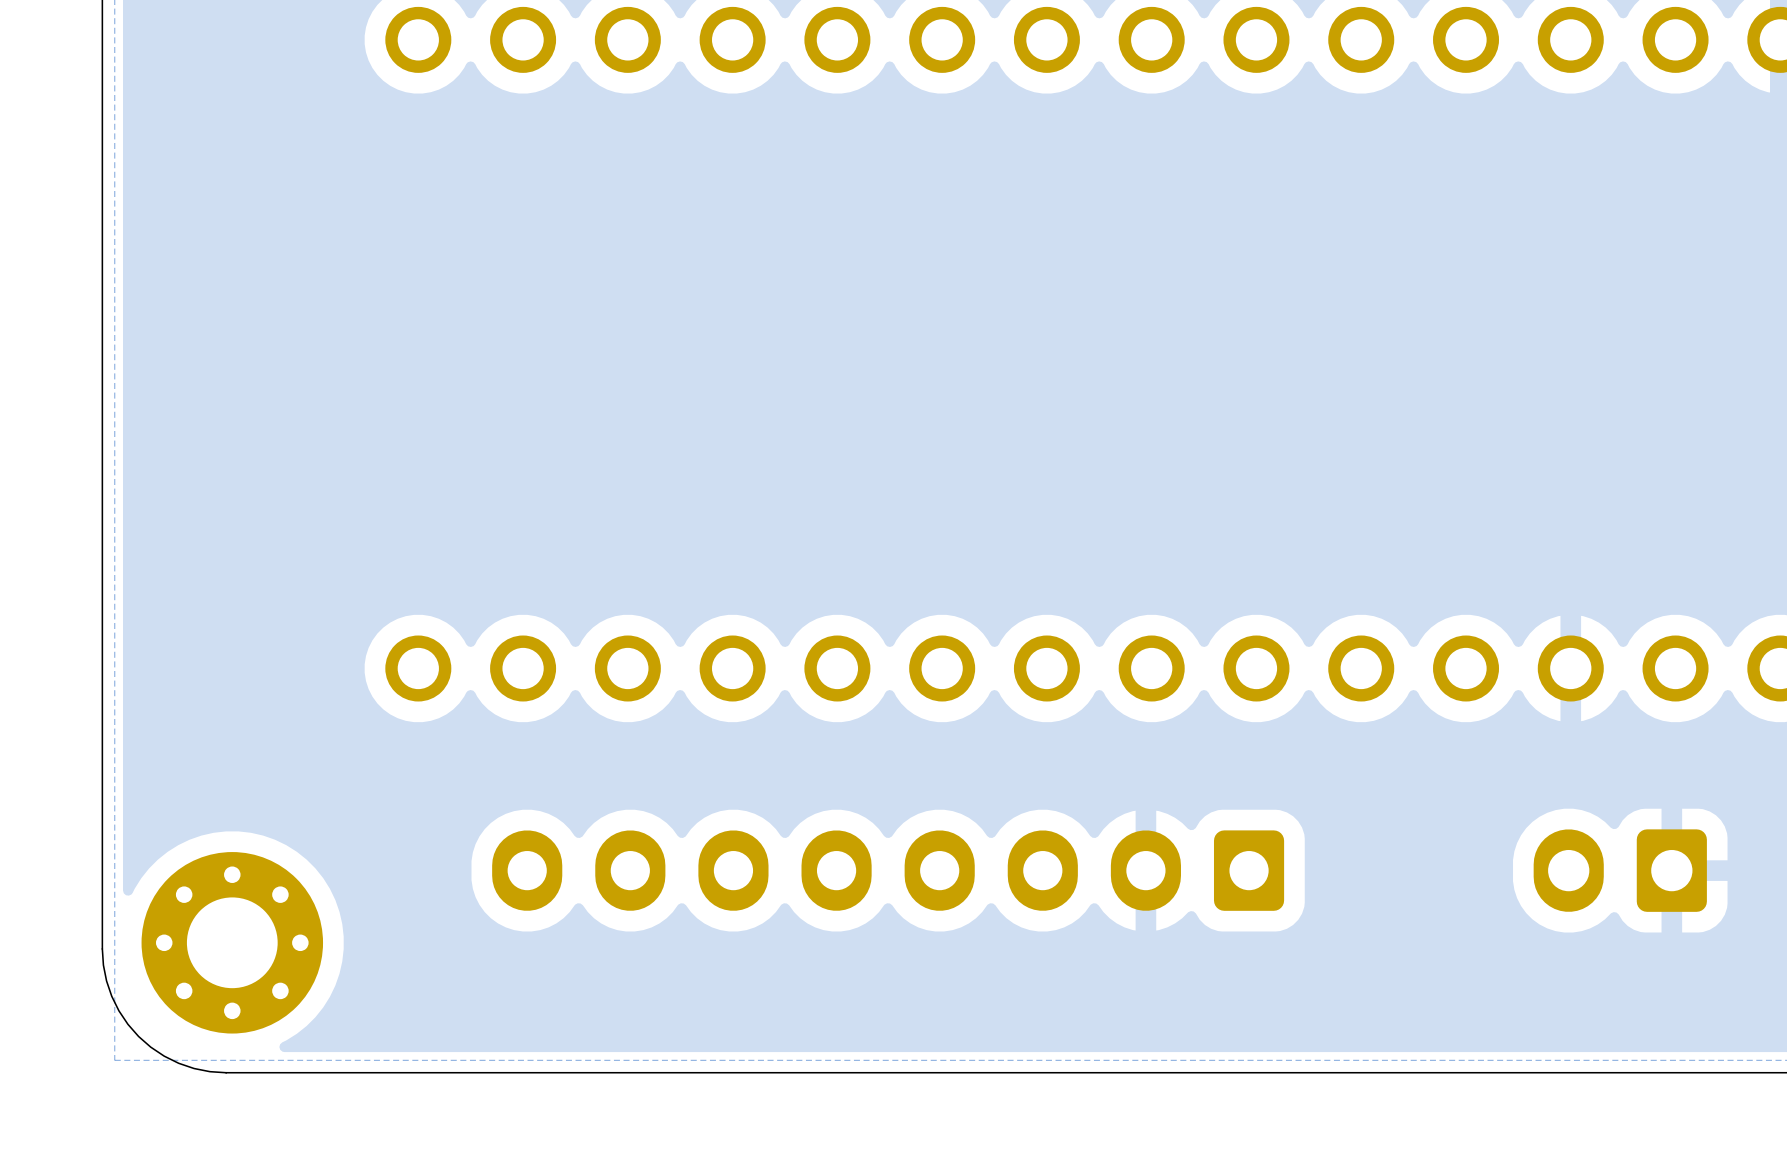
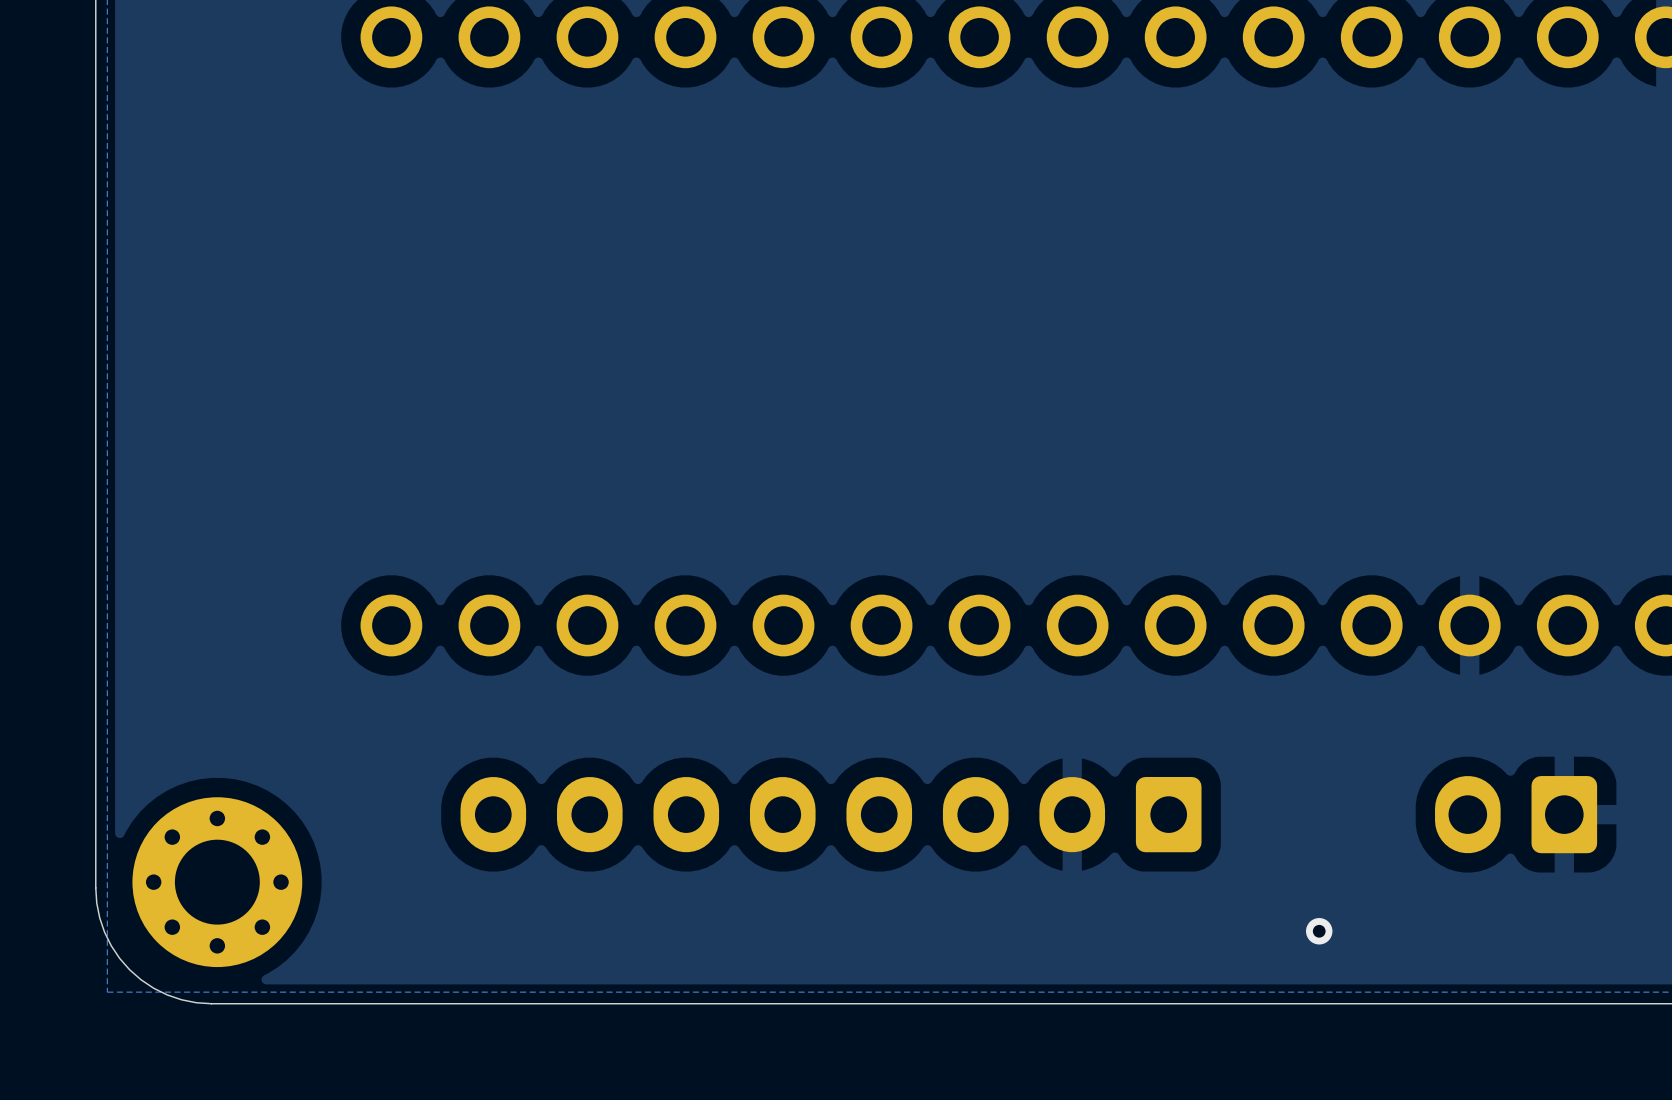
via: none -> (1319, 931)

